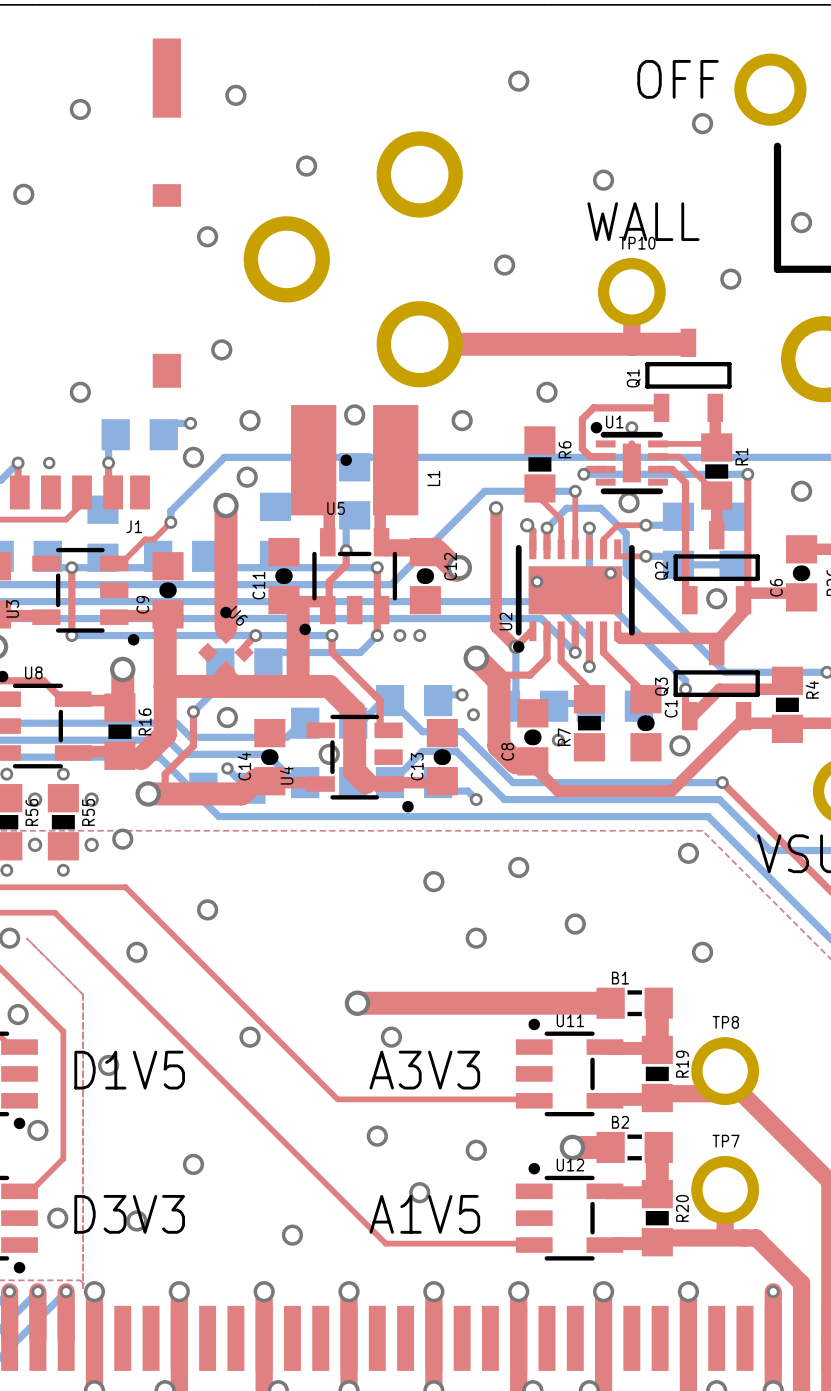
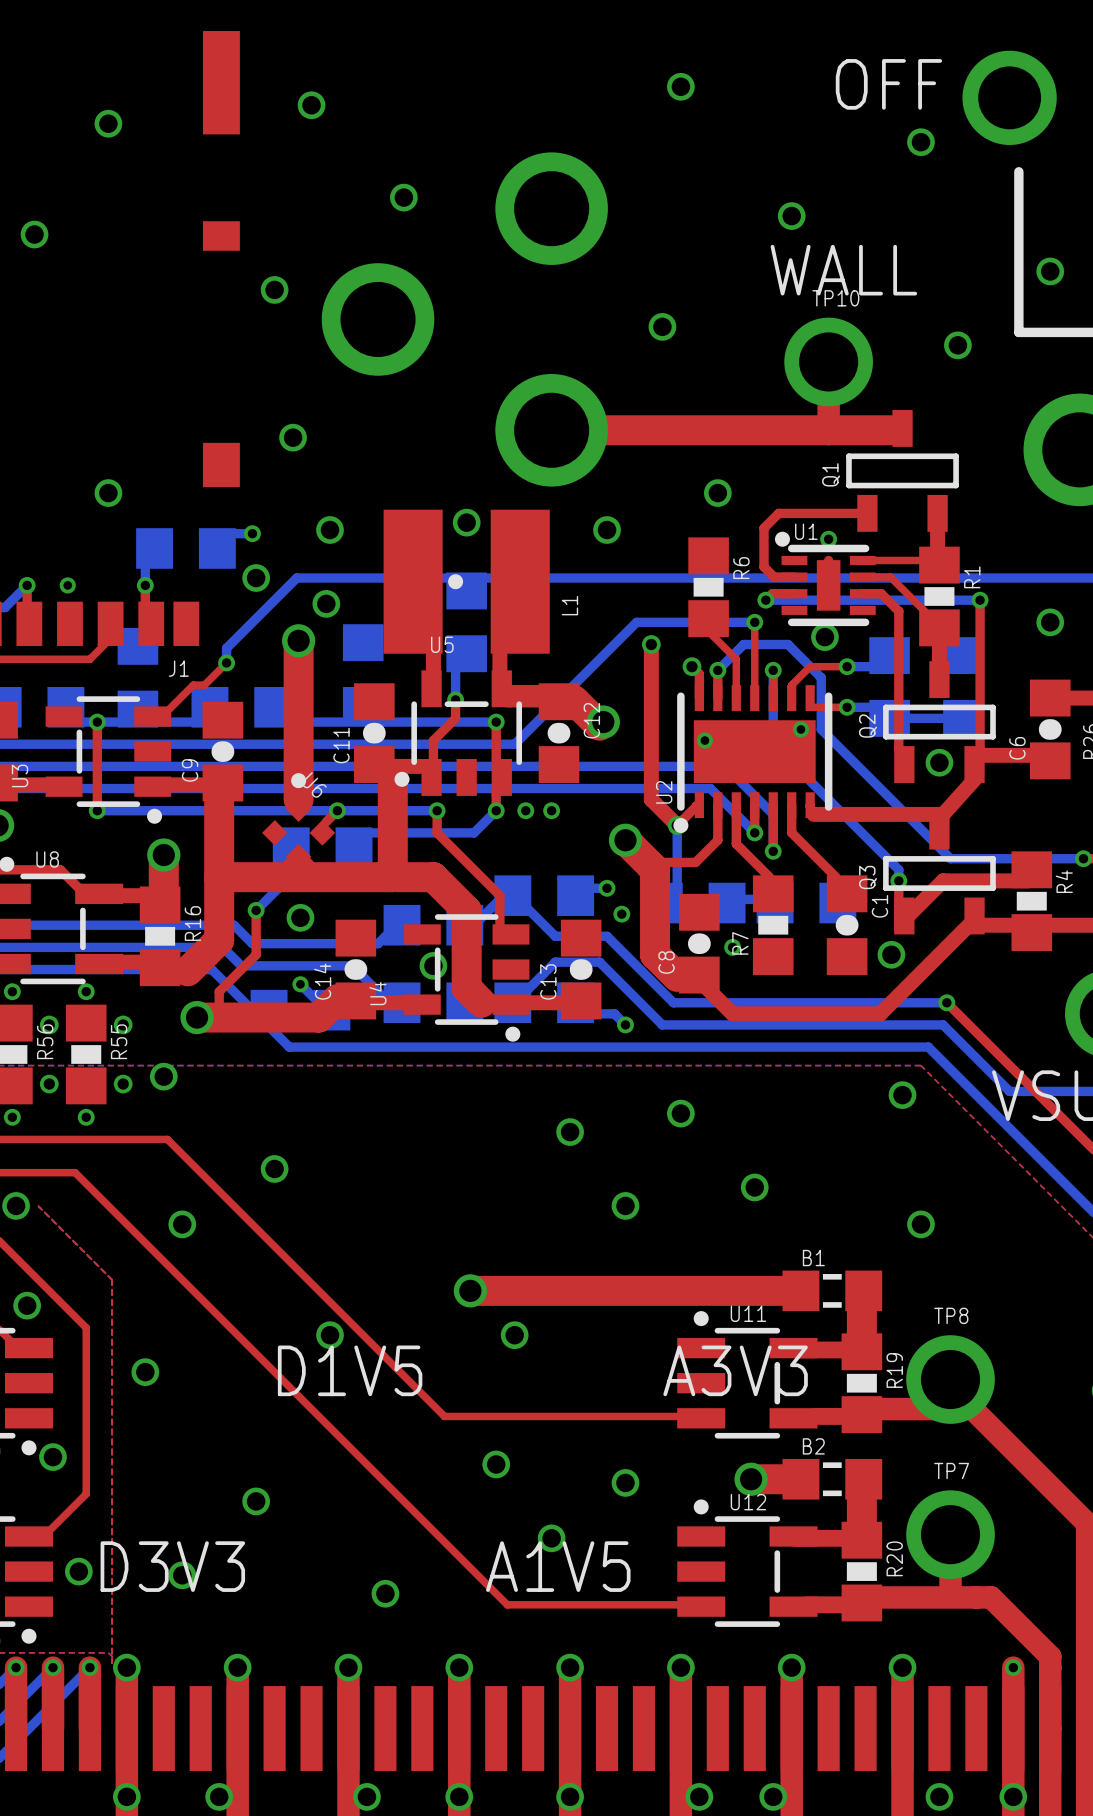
U5 footprint: [299, 528, 398, 636] -> [394, 670, 523, 796]
U3 footprint: [32, 547, 140, 646] -> [45, 696, 172, 824]
U4 footprint: [306, 714, 414, 813] -> [403, 914, 530, 1042]
text position: D1V5 (129, 1070) -> D1V5 (350, 1370)
text position: A3V3 (424, 1070) -> A3V3 (735, 1370)

